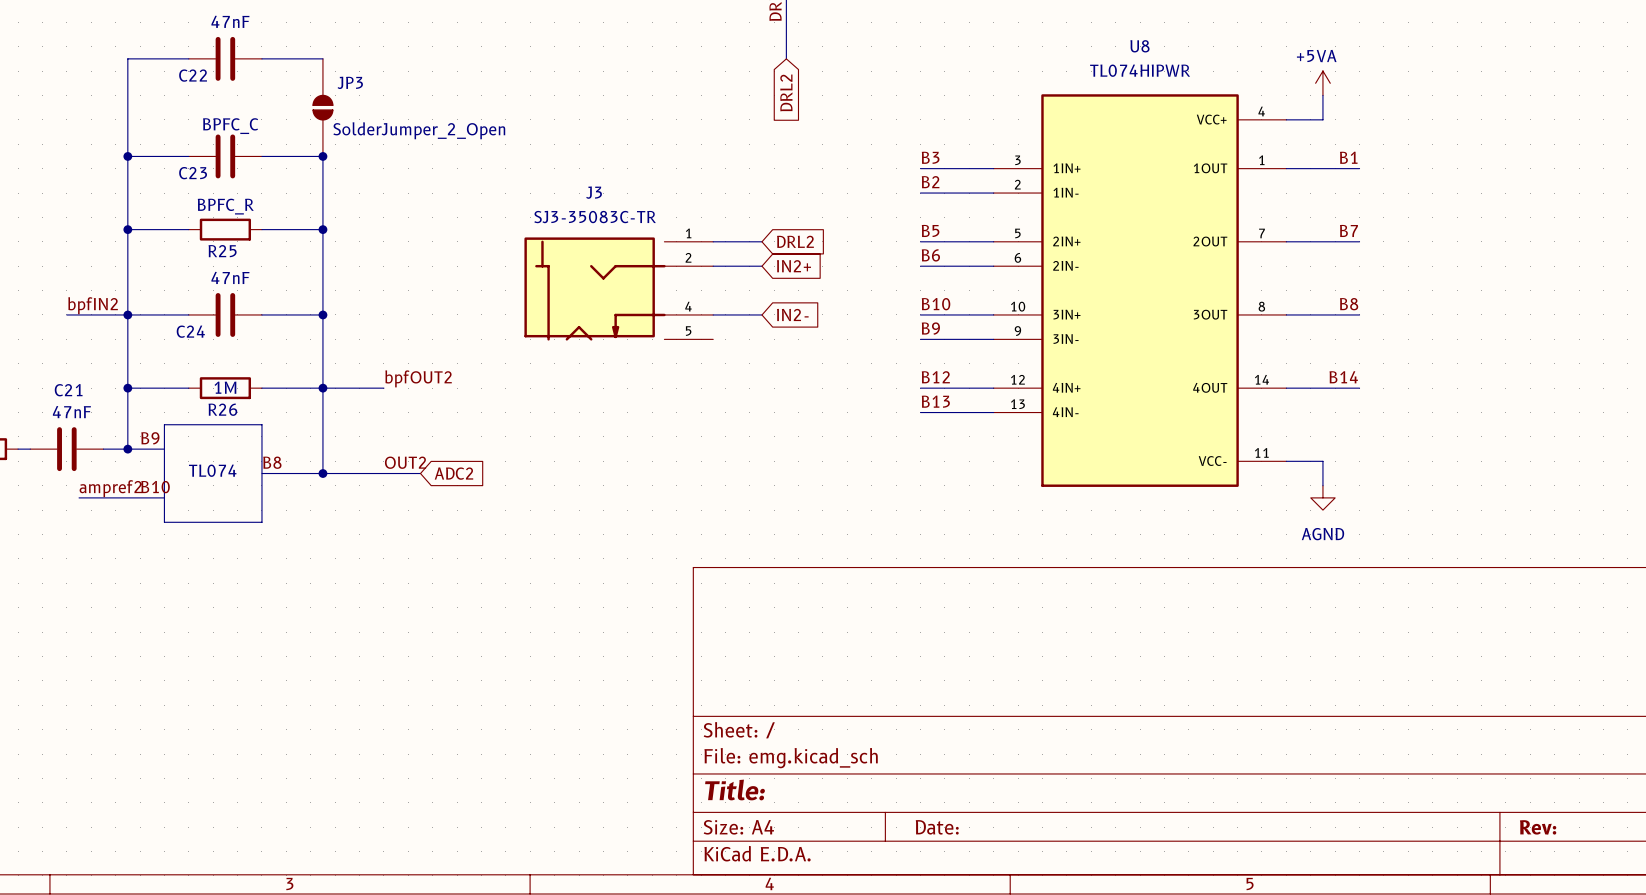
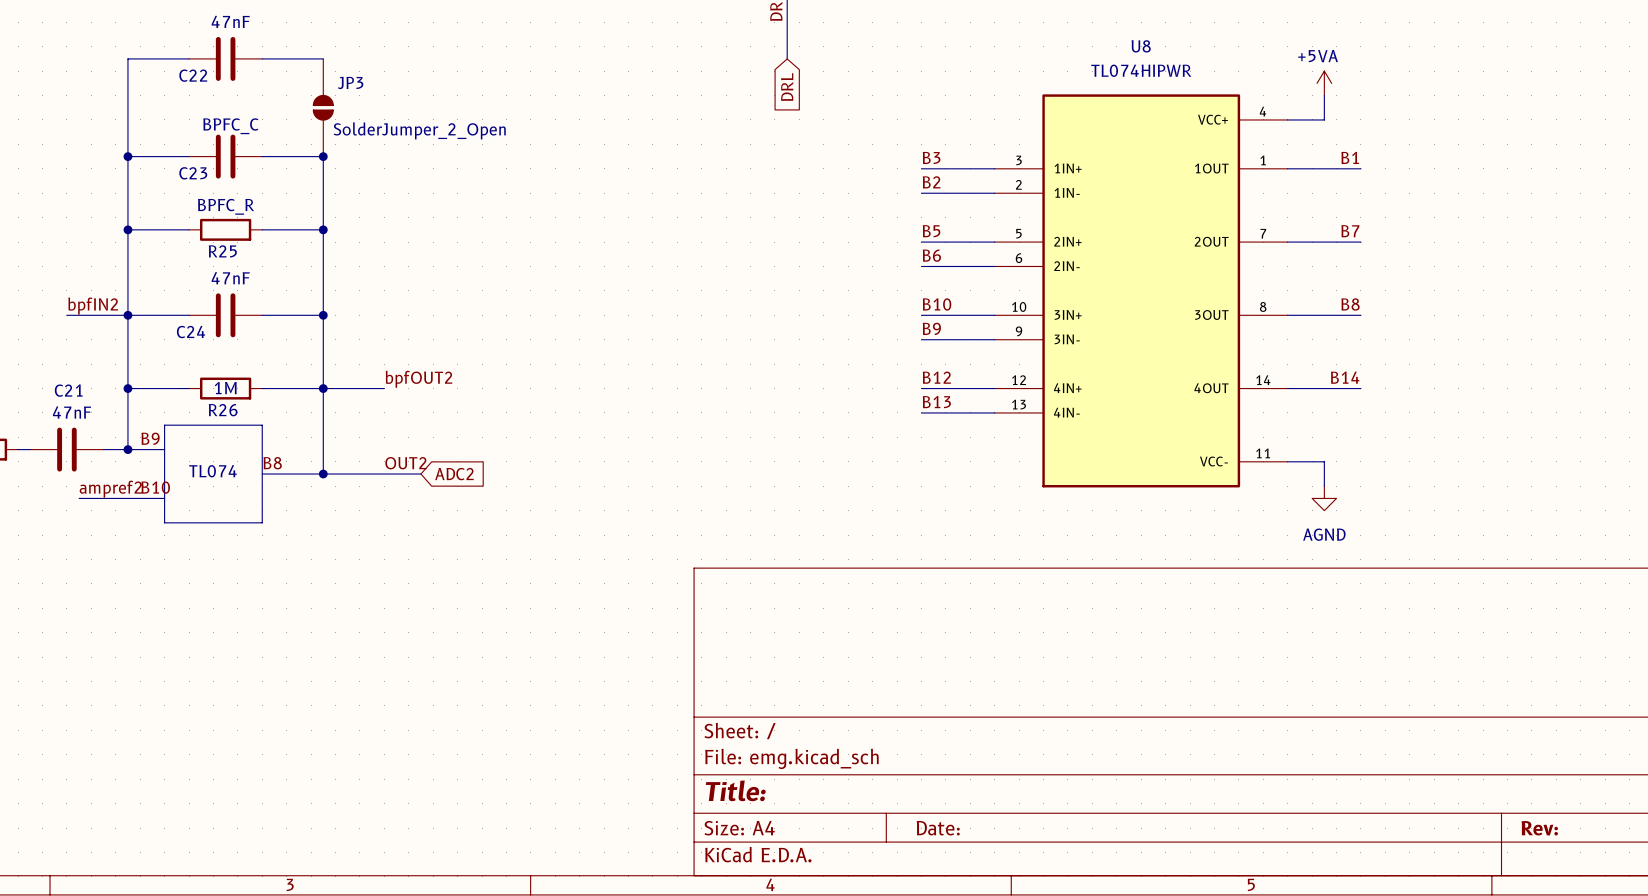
global label: DRL2 (786, 92) -> DRL (787, 87)
wire: (713, 241) (761, 241) -> none
global label: DRL2 (795, 241) -> none
wire: (713, 266) (761, 266) -> none
global label: IN2+ (793, 266) -> none
J3: SJ3-35083C-TR (618, 289) -> none
wire: (713, 314) (761, 314) -> none
global label: IN2- (792, 314) -> none

